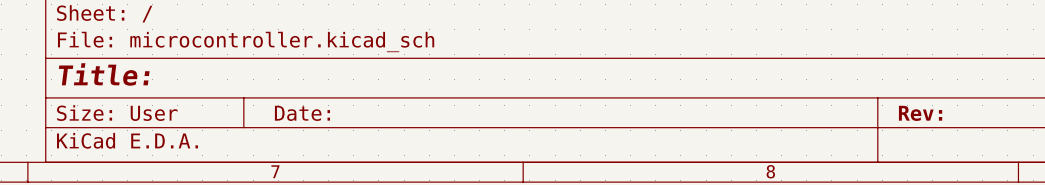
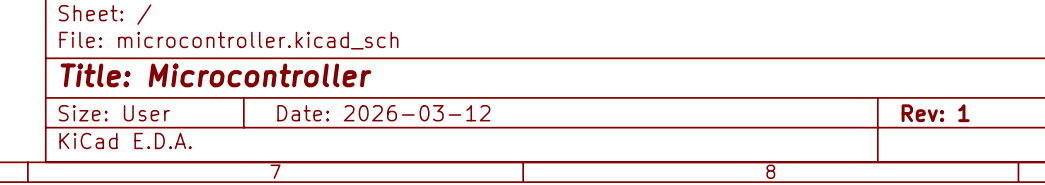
title block: Title: (104, 74) -> Title: Microcontroller (215, 75)
title block: Date: (302, 113) -> Date: 2026-03-12 (383, 113)
title block: Rev: (920, 113) -> Rev: 1 (935, 113)

